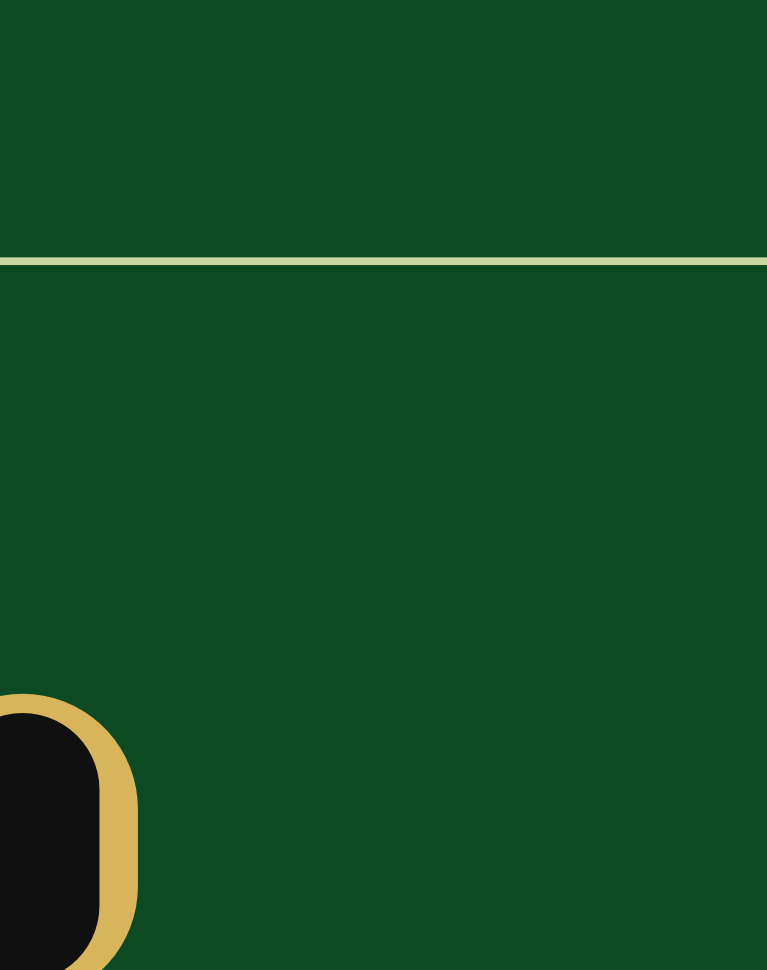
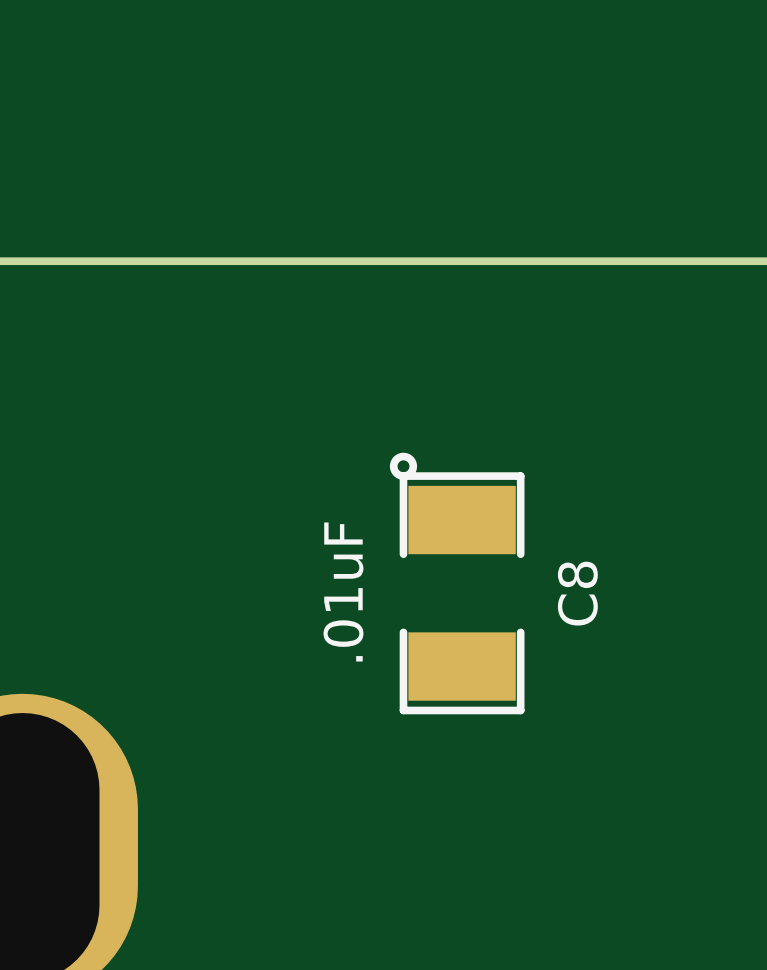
C8: none -> .01uF (457, 583)

